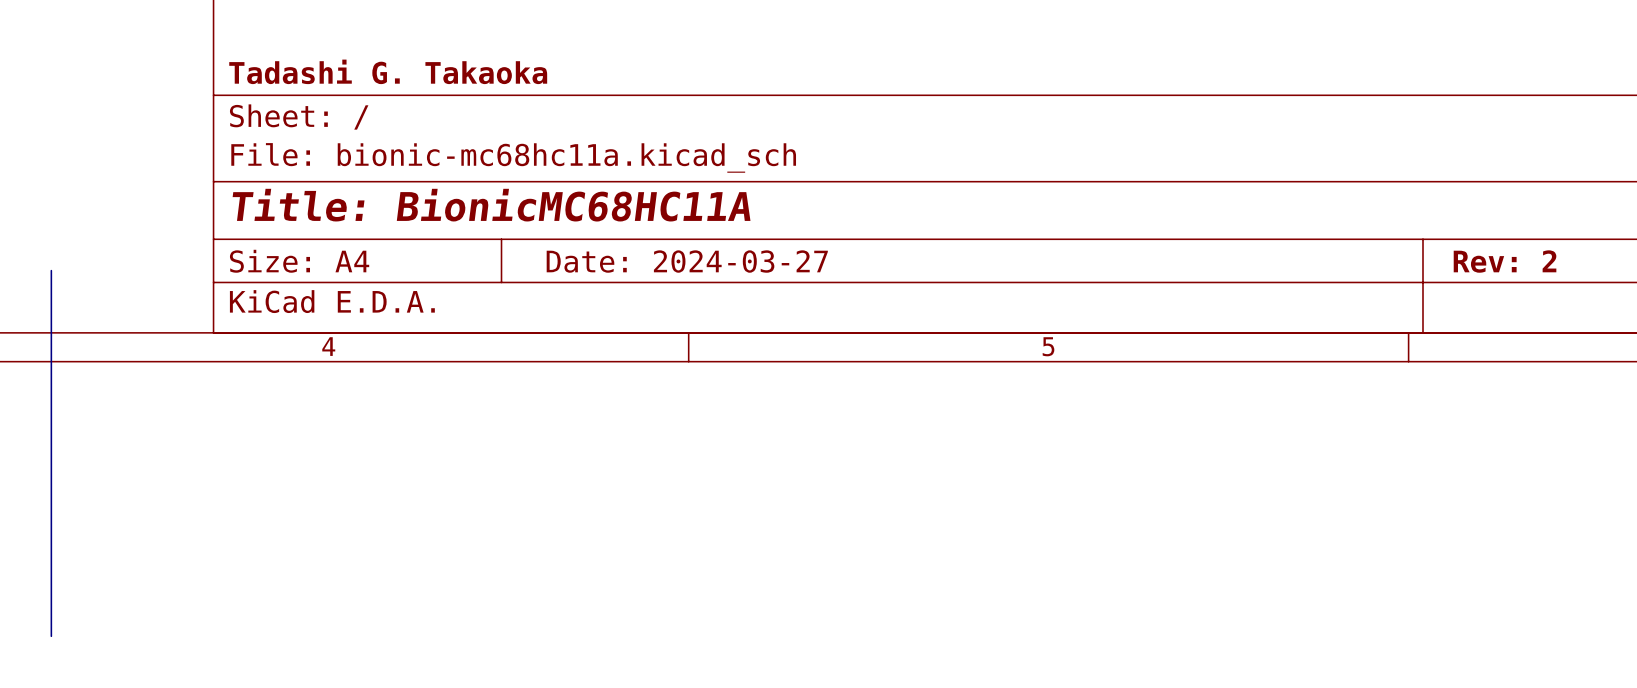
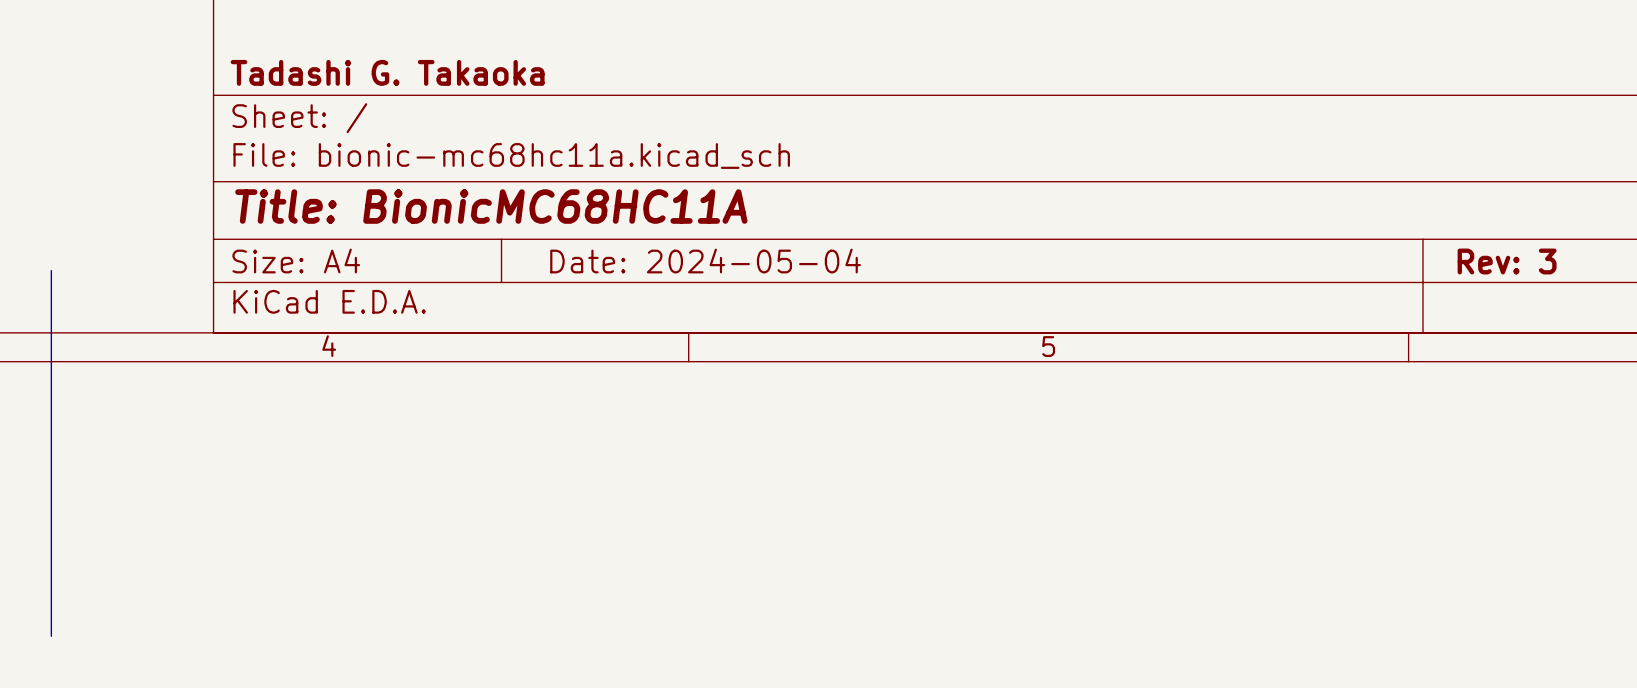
title block: Date: 2024-03-27 (687, 261) -> Date: 2024-05-04 (705, 260)
title block: Rev: 2 (1505, 261) -> Rev: 3 (1507, 261)

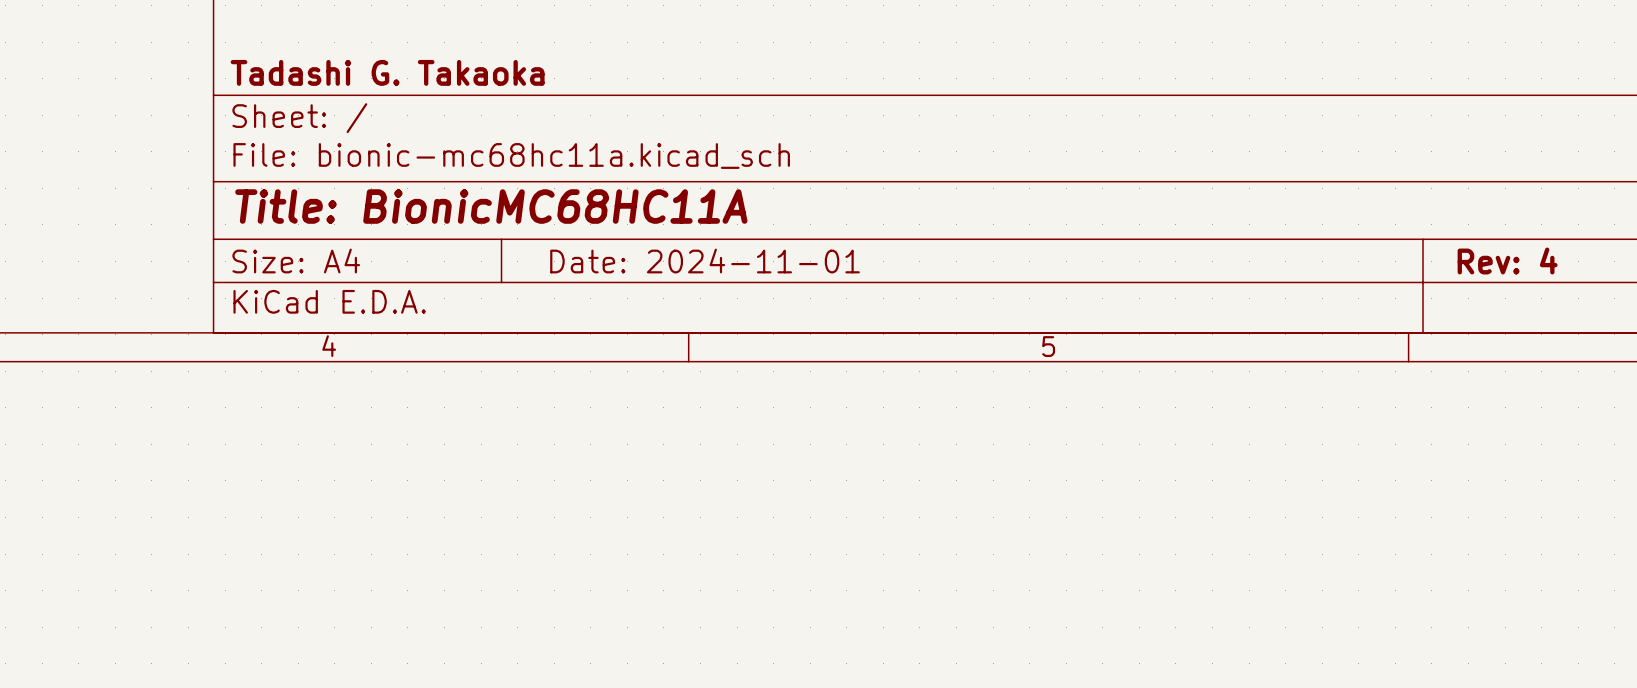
title block: Date: 2024-05-04 (705, 260) -> Date: 2024-11-01 (705, 260)
title block: Rev: 3 (1507, 261) -> Rev: 4 (1507, 260)
bus: (51, 270) (51, 636) -> none

